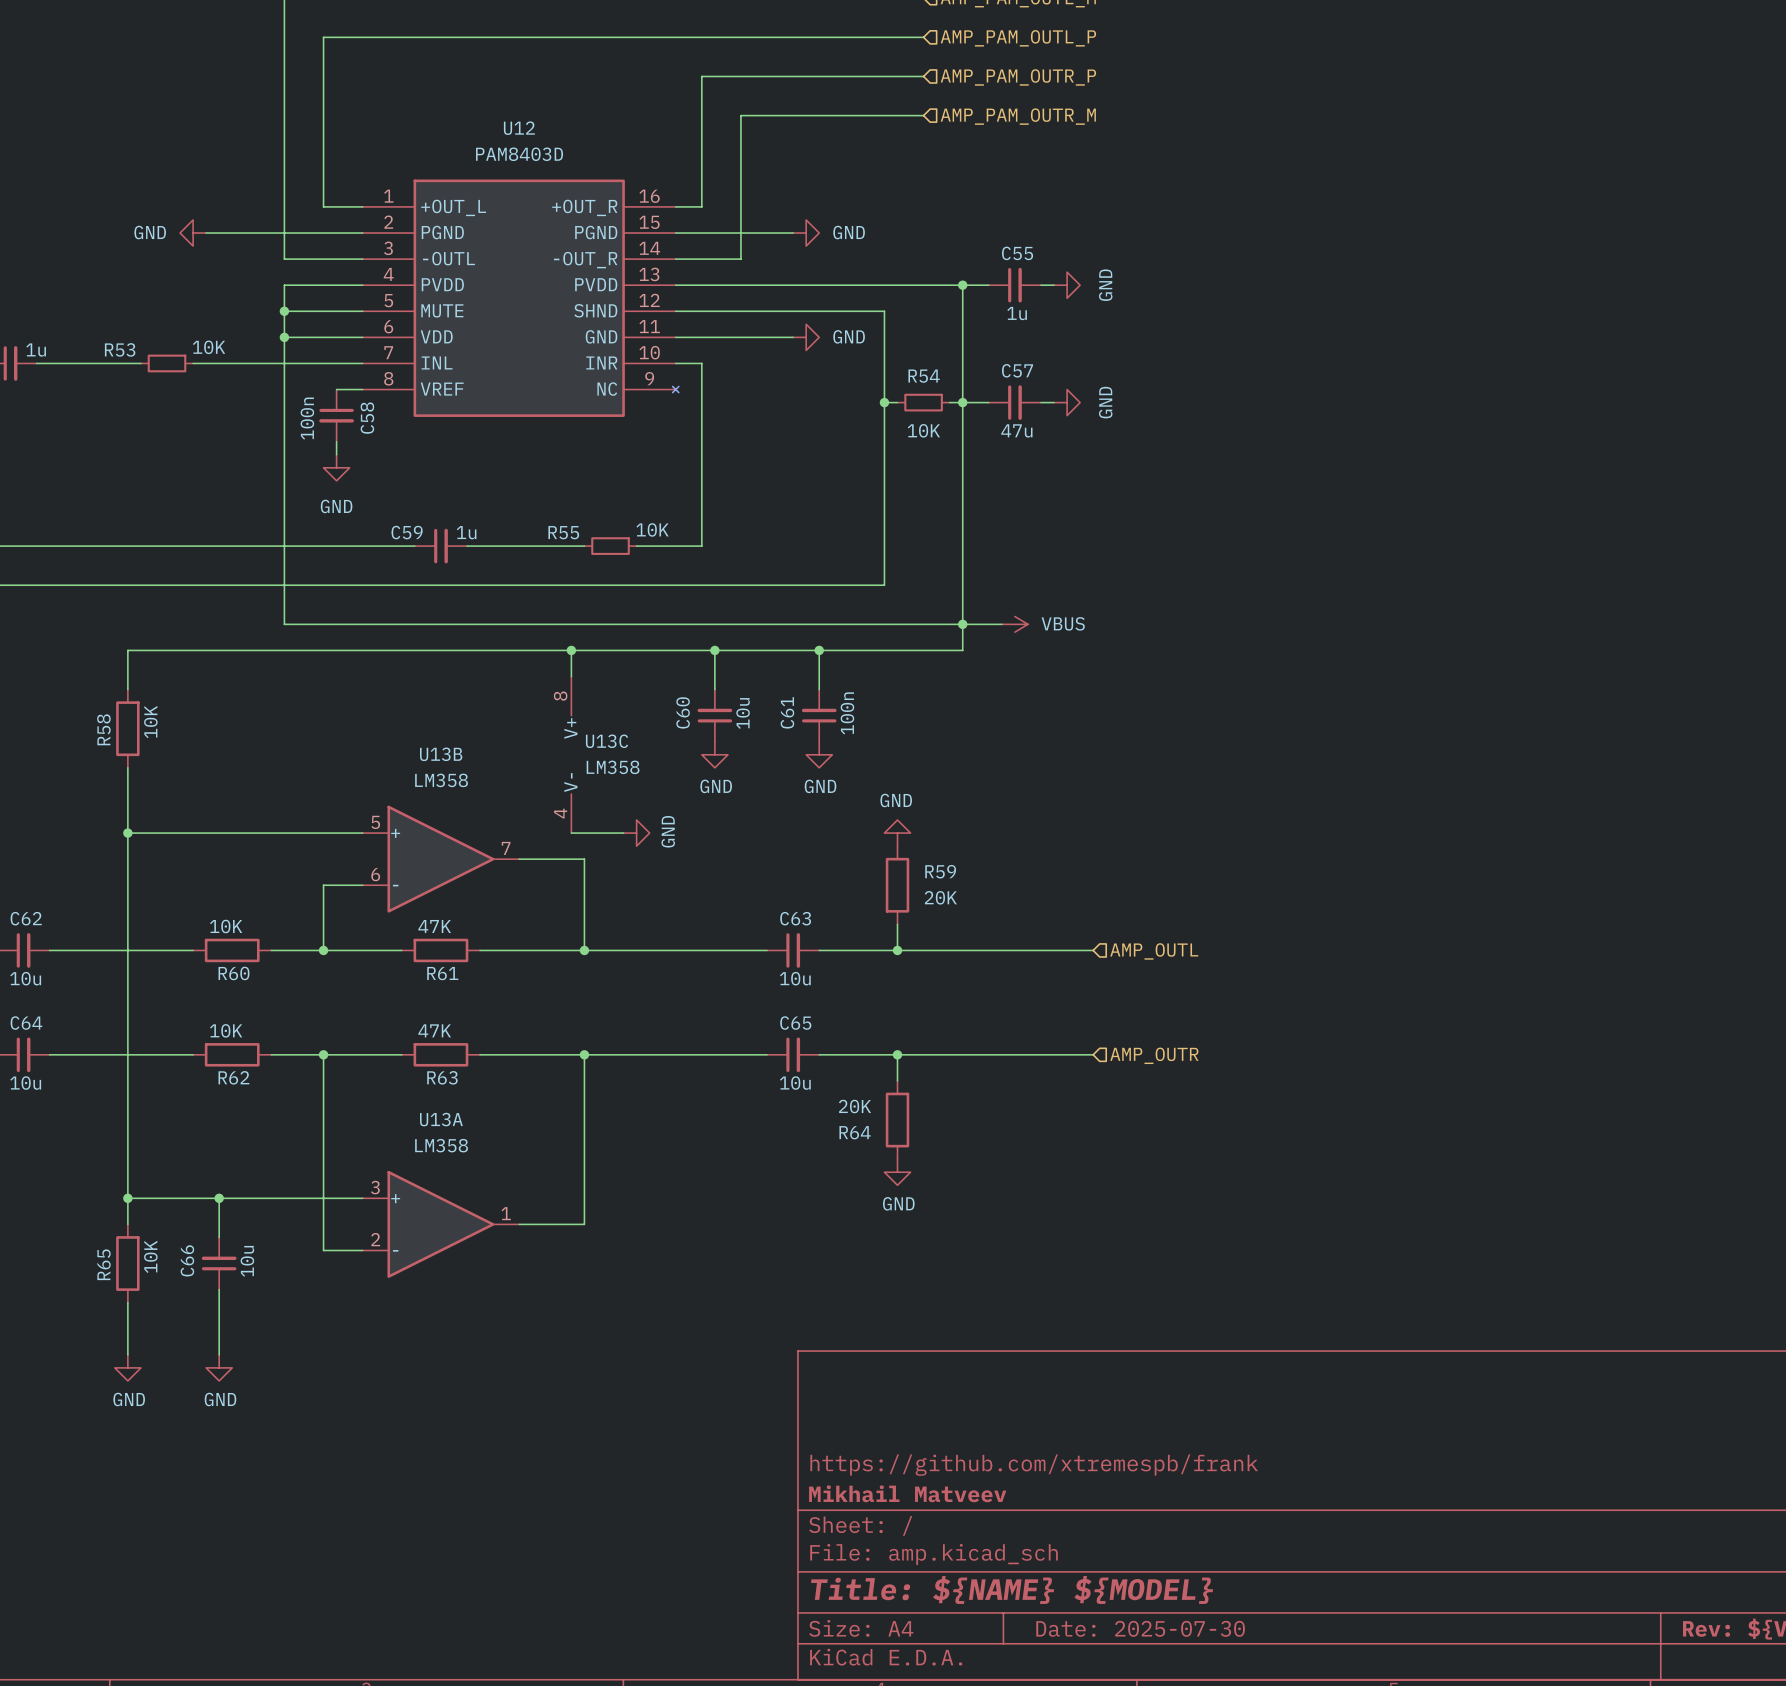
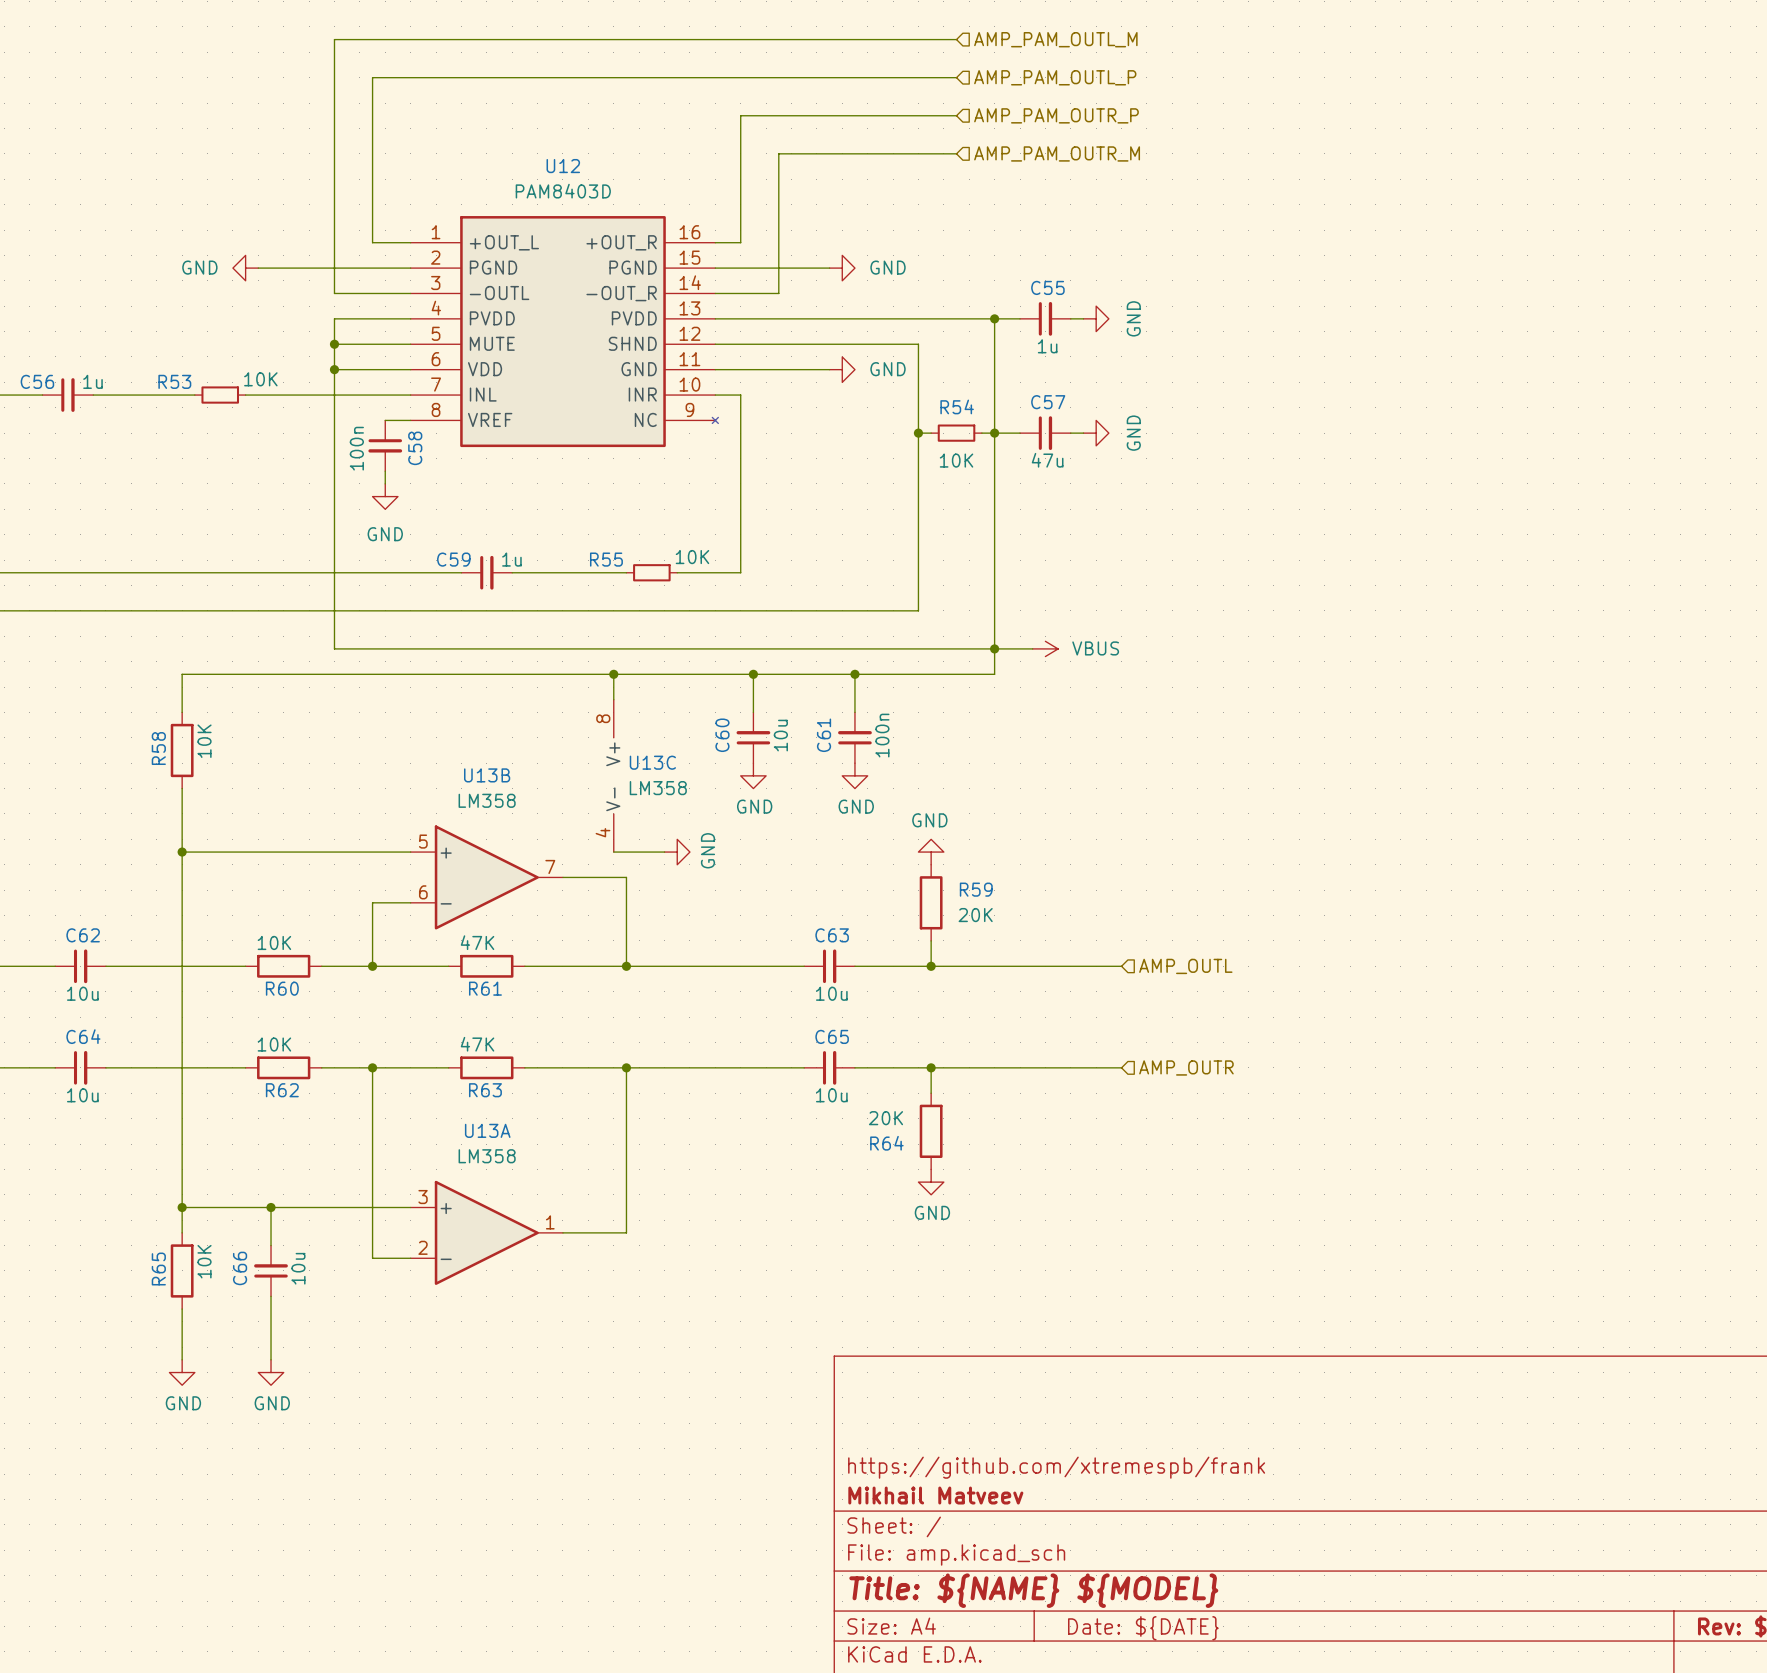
title block: Date: 2025-07-30 (1140, 1628) -> Date: ${DATE} (1143, 1628)

